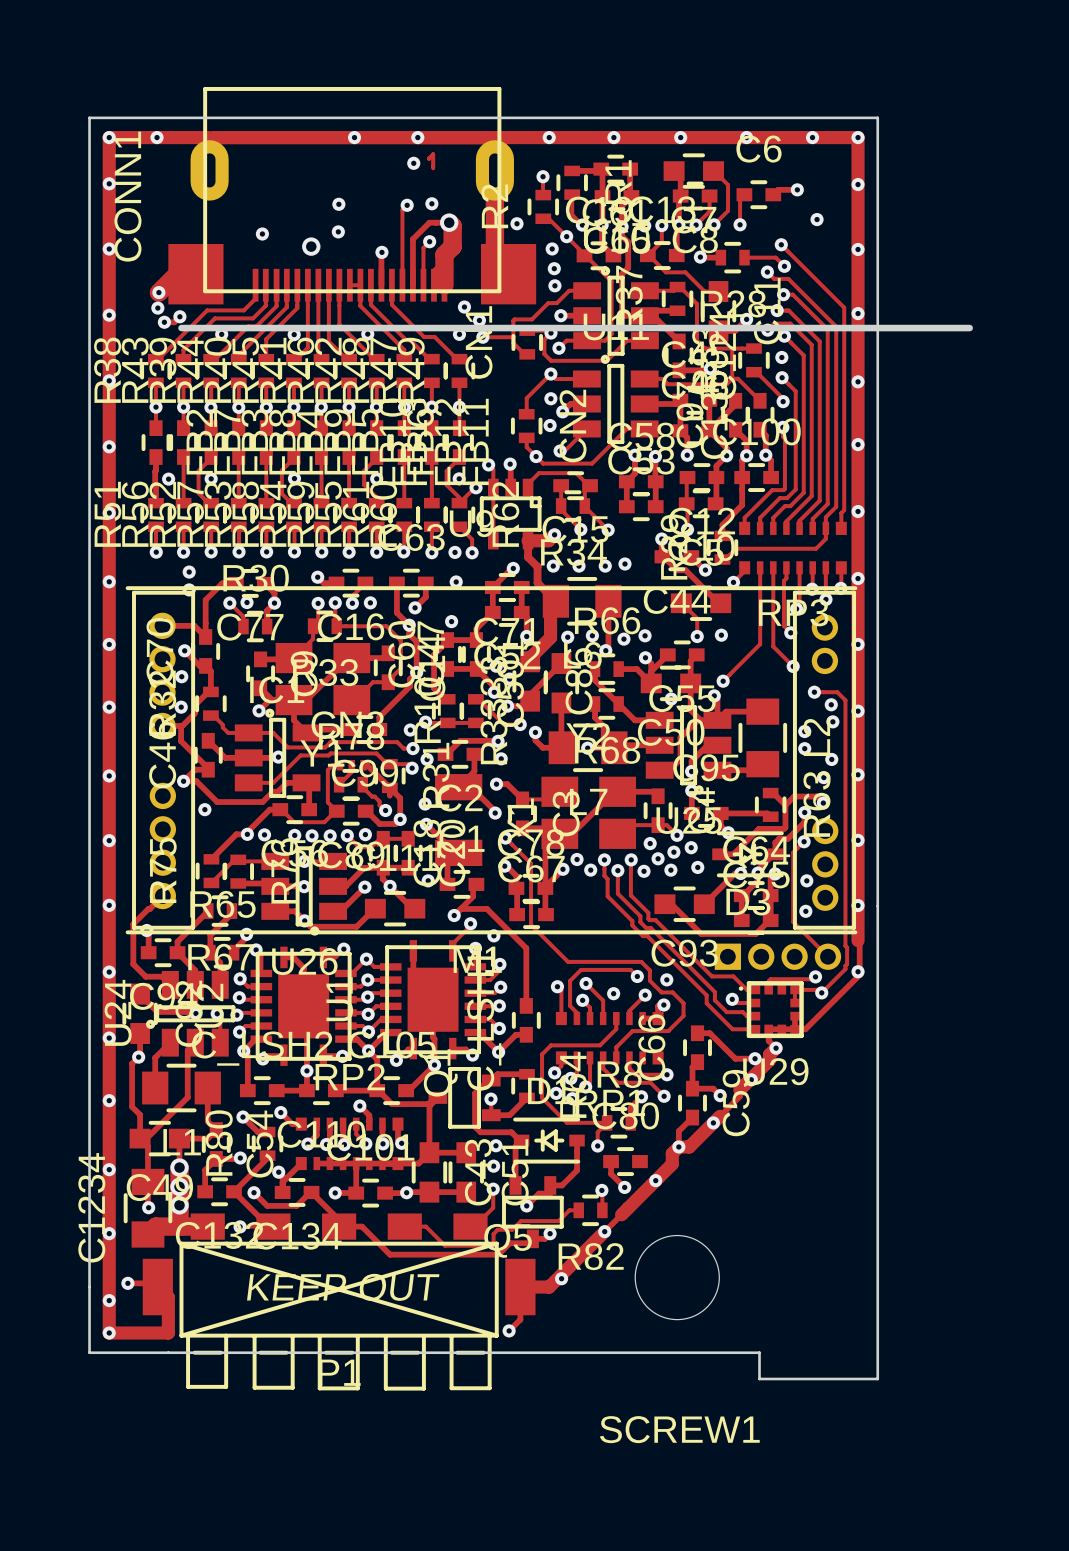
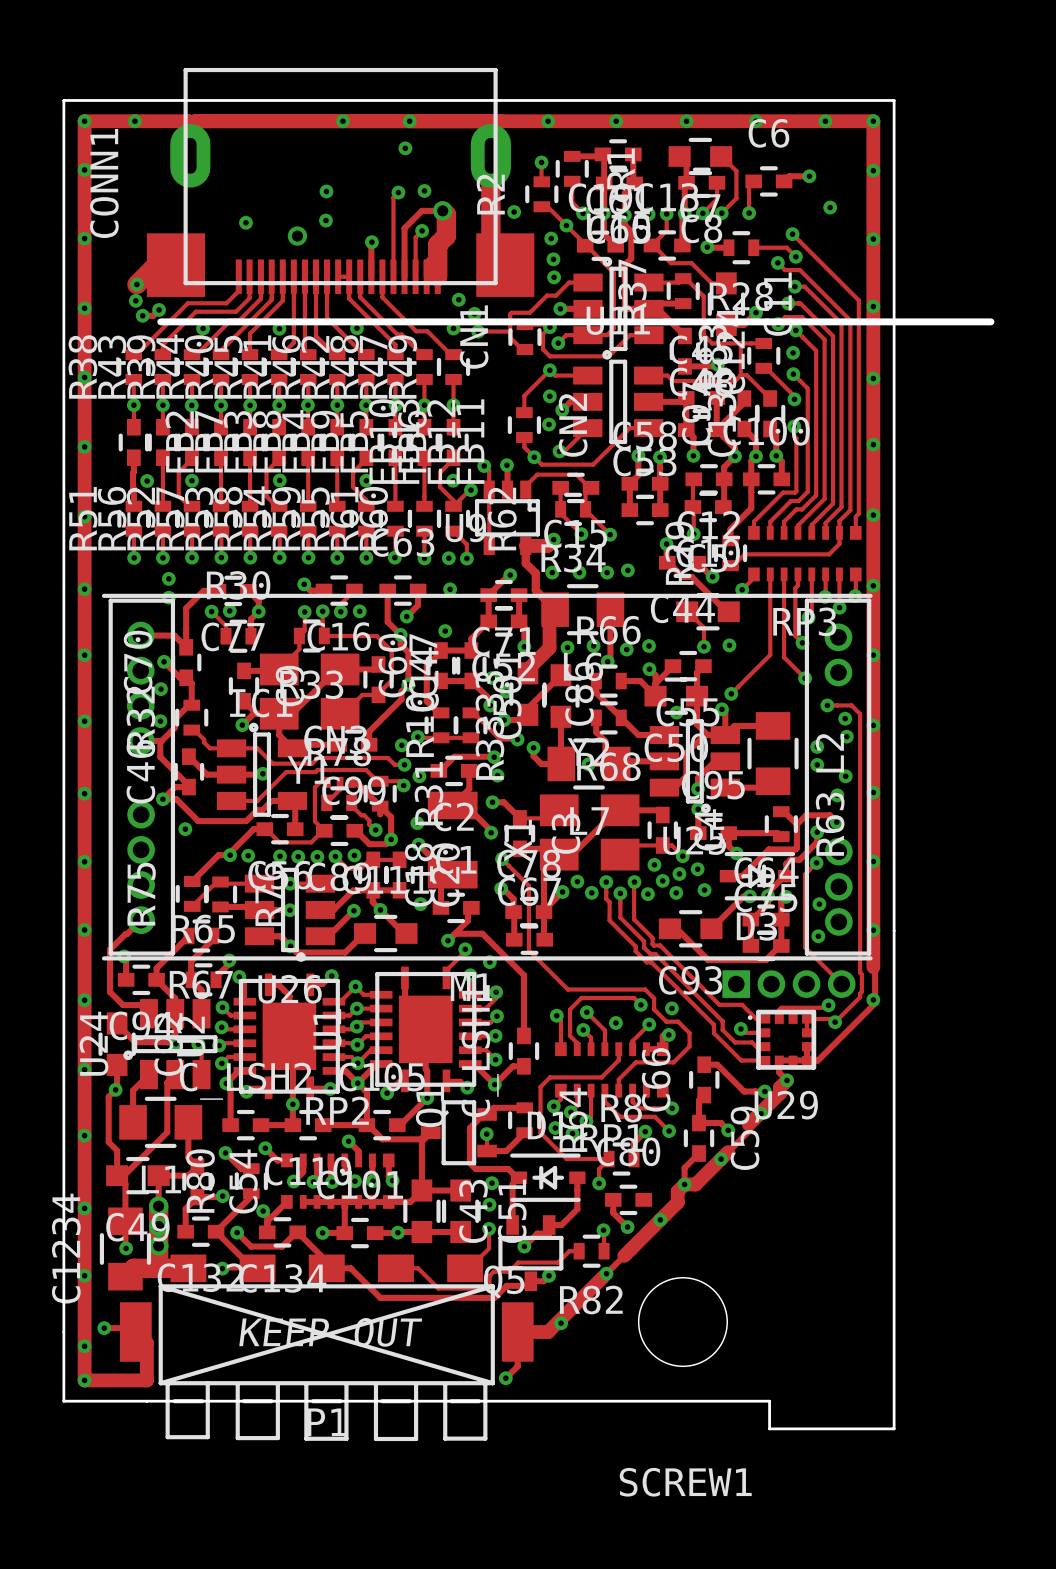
track: (428, 158) (433, 154) (433, 168) -> none

